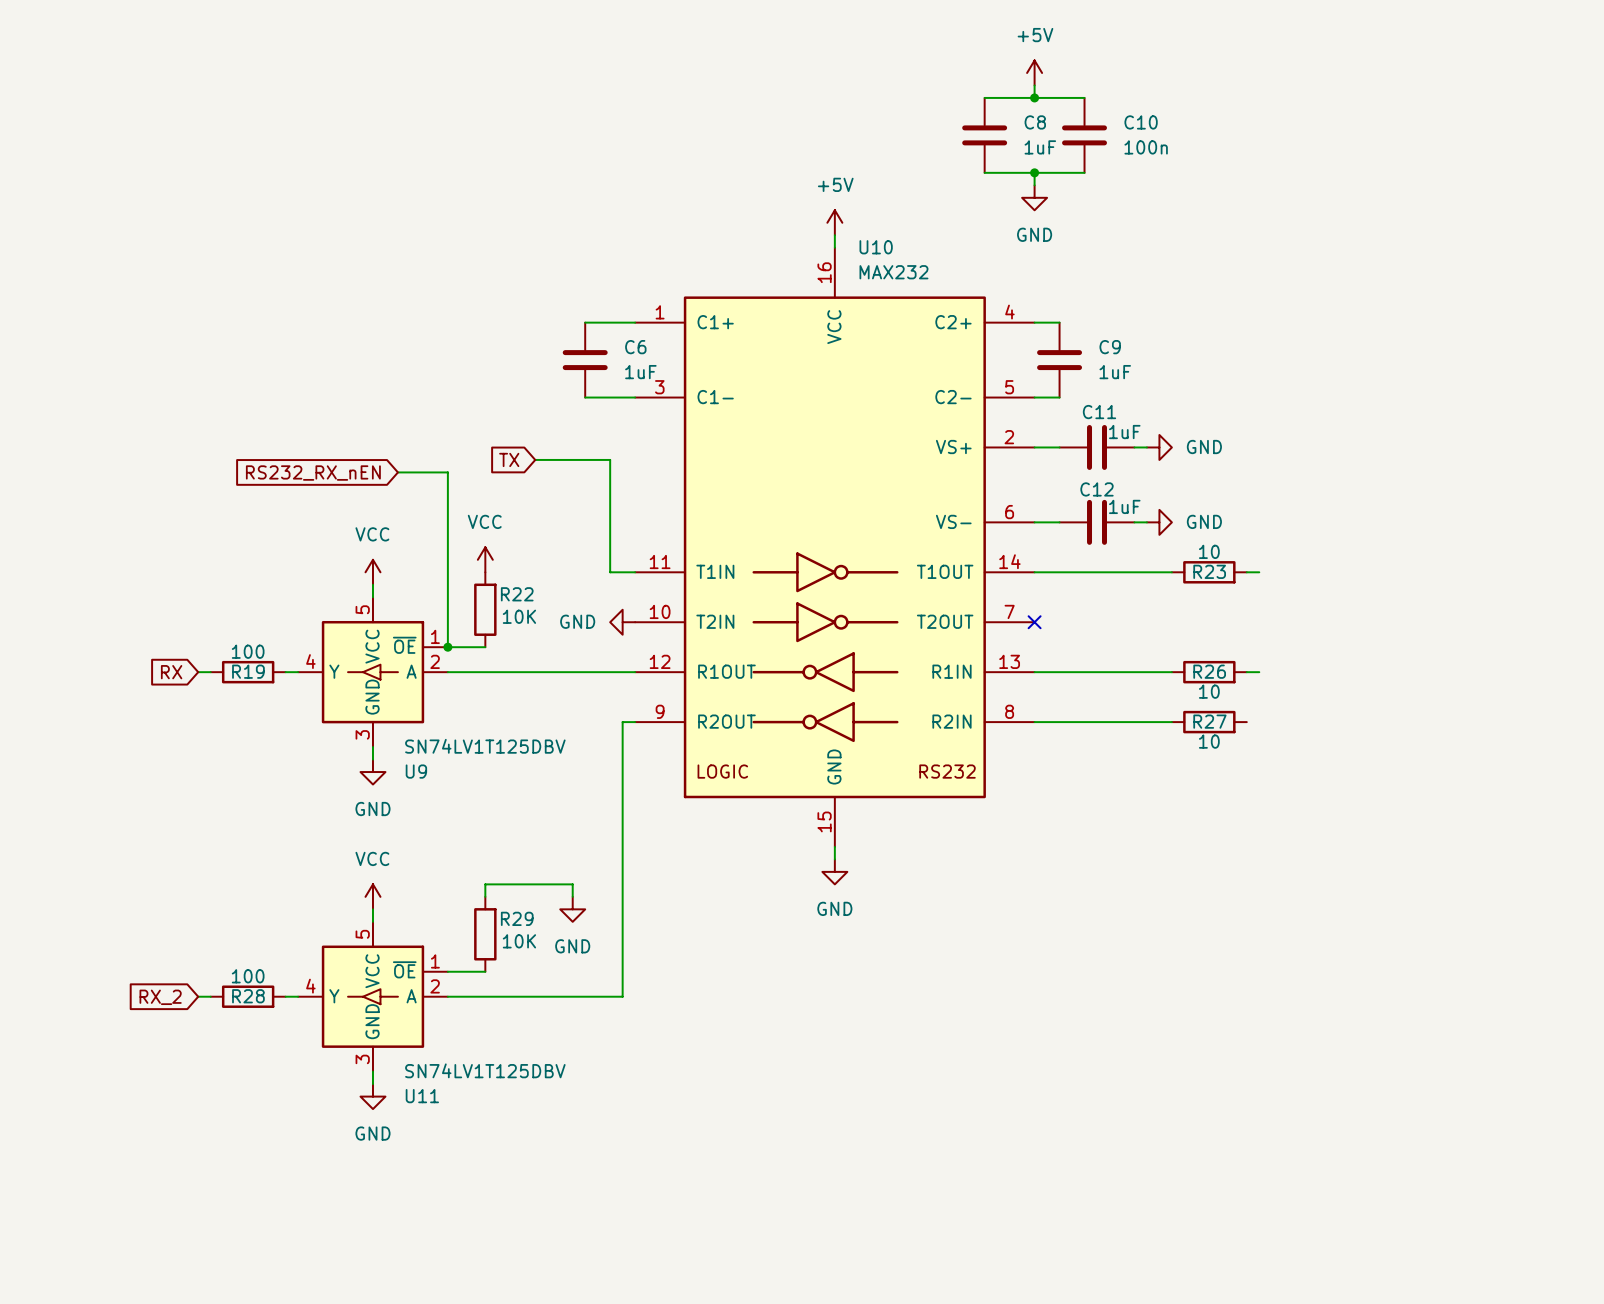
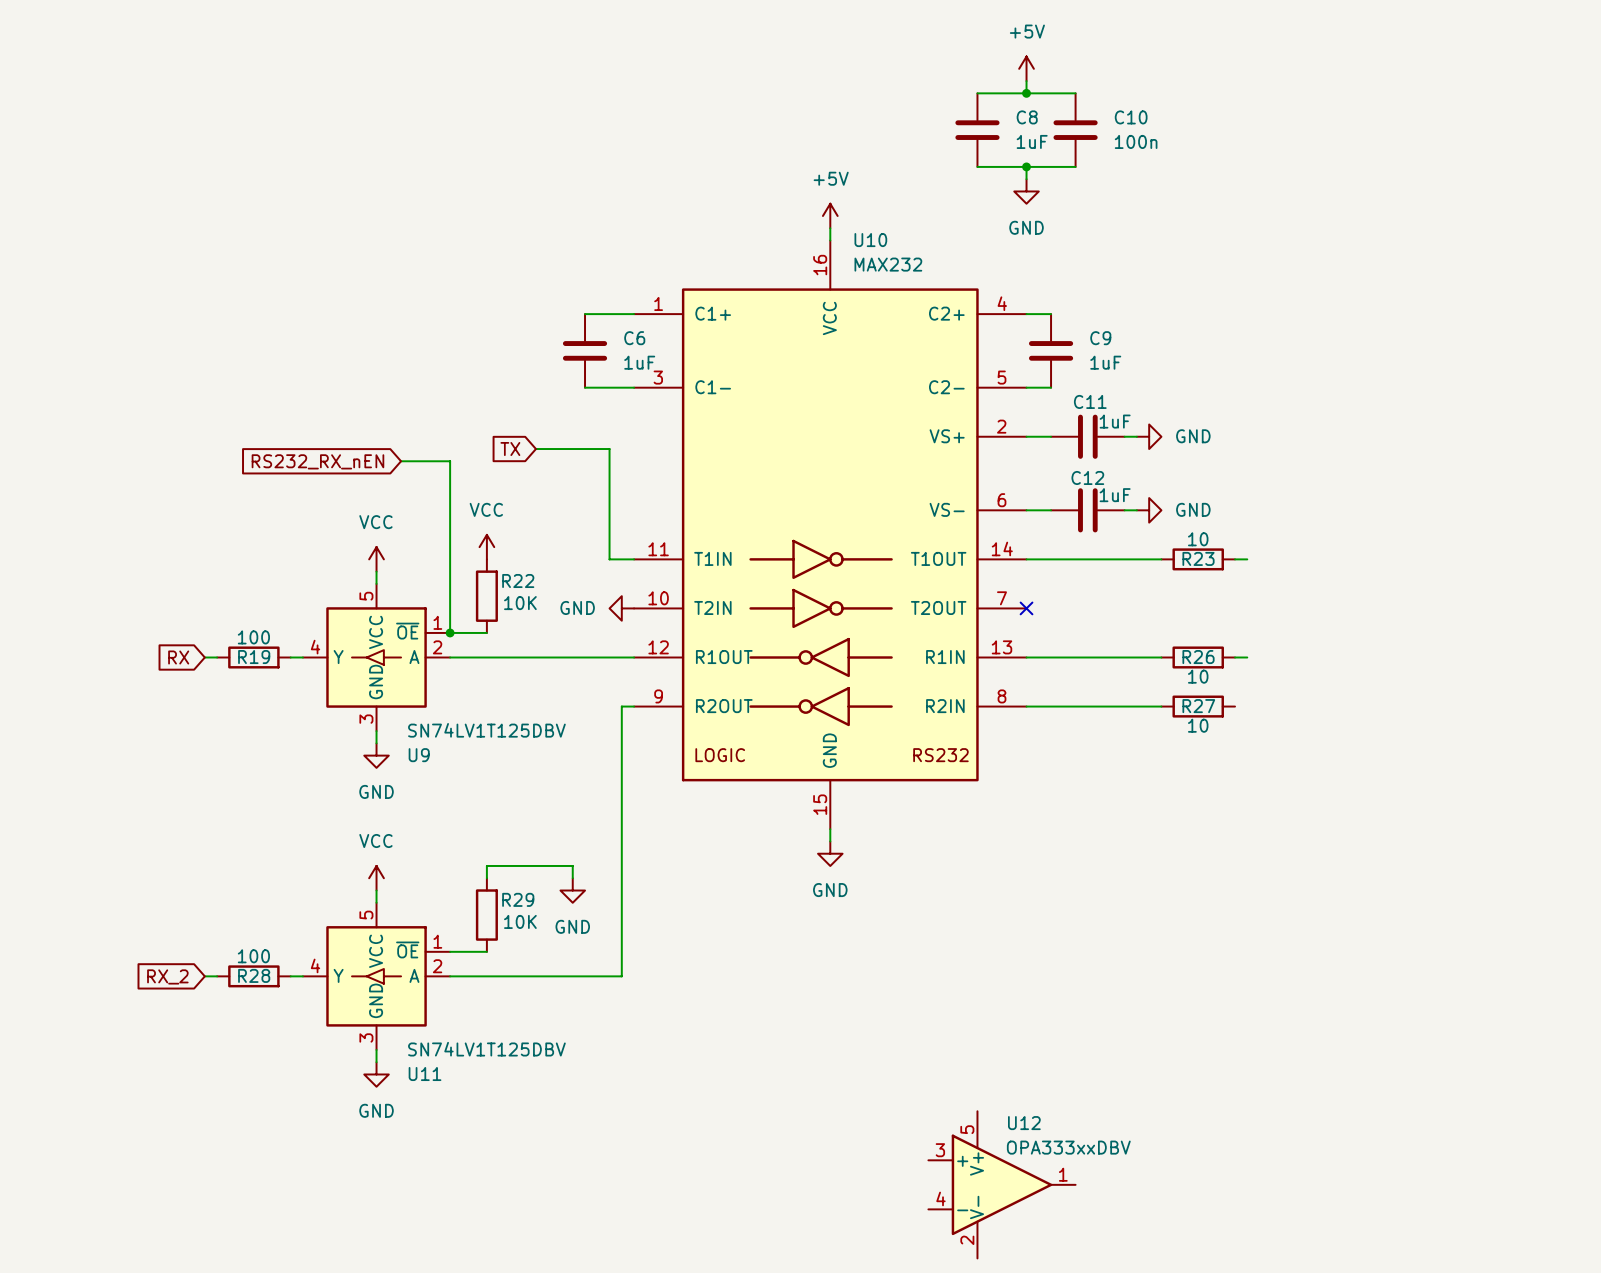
U12: none -> OPA333xxDBV (1001, 1184)

